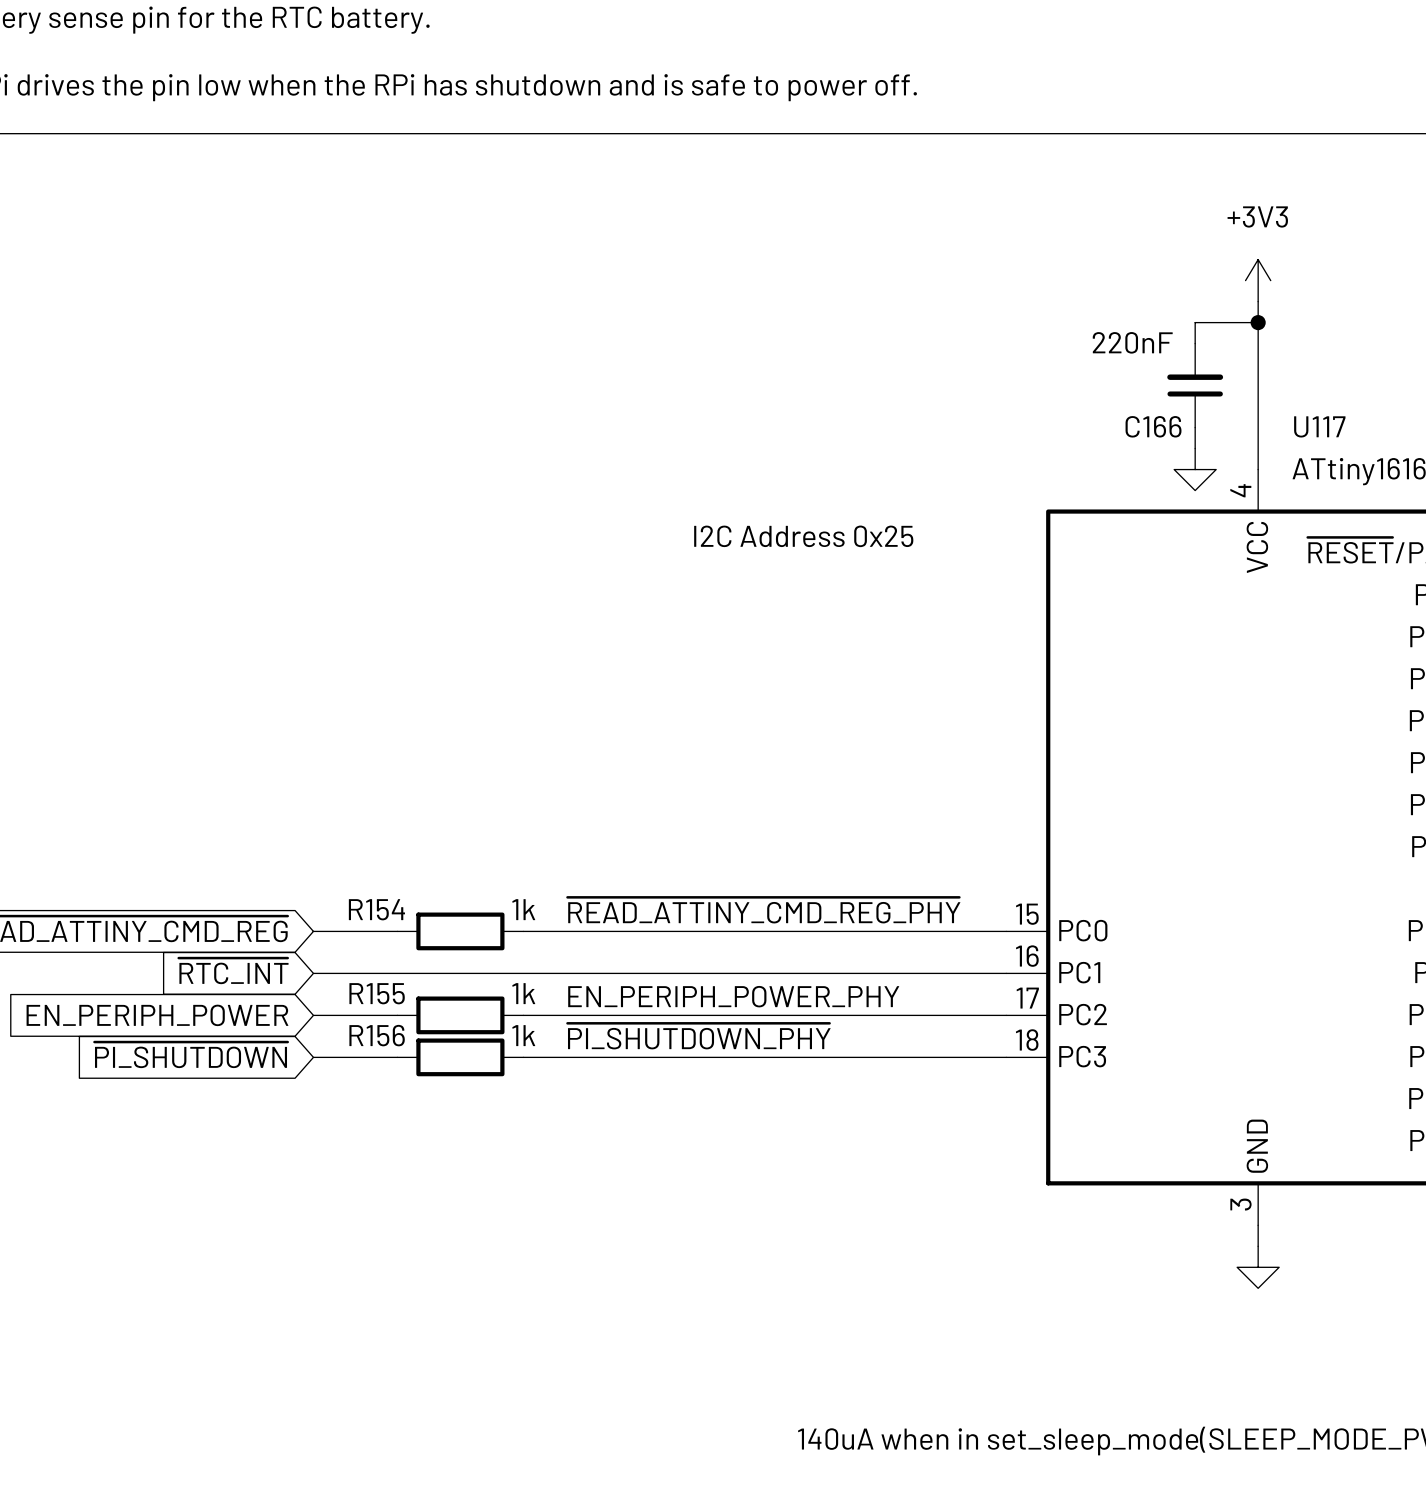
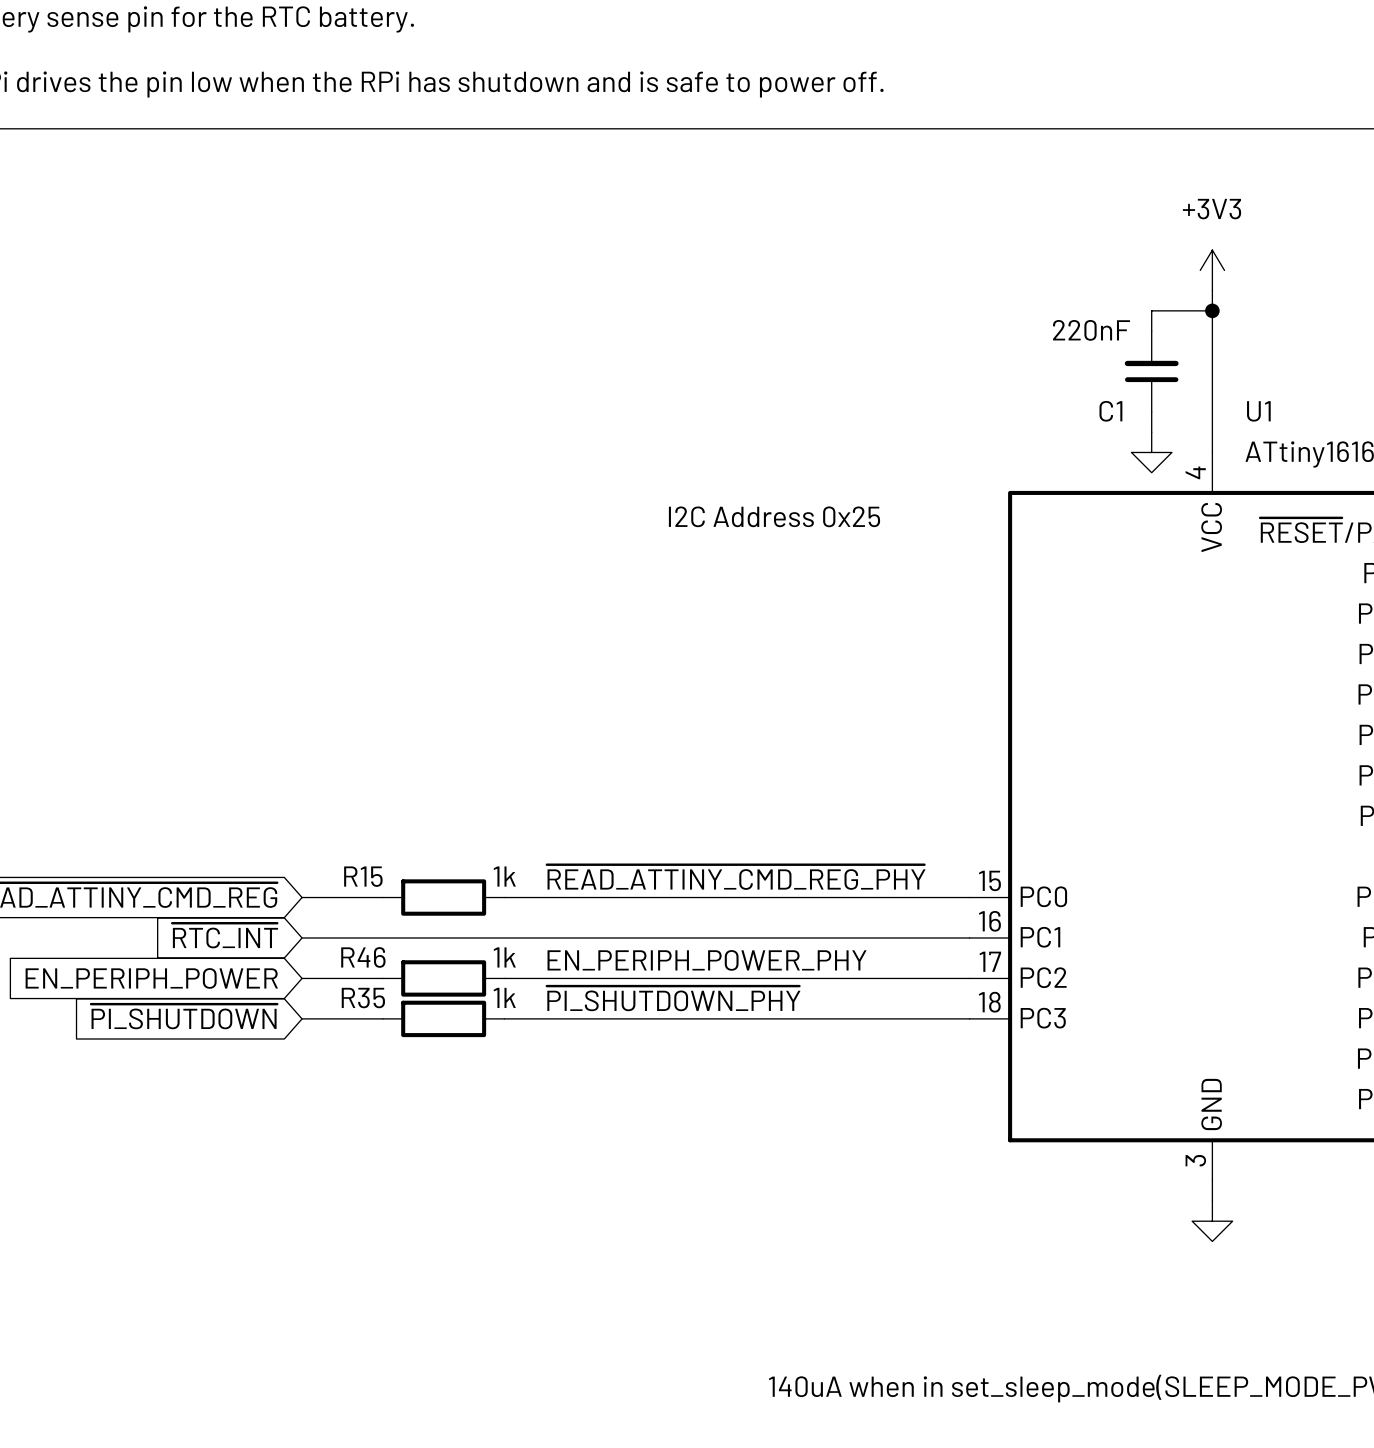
C166 name: C166 (1153, 426) -> C1 (1110, 411)
U117 name: U117 (1319, 426) -> U1 (1258, 411)
R154 name: R154 (376, 909) -> R15 (363, 876)
R155 name: R155 (377, 993) -> R46 (363, 957)
R156 name: R156 (377, 1035) -> R35 (363, 998)

